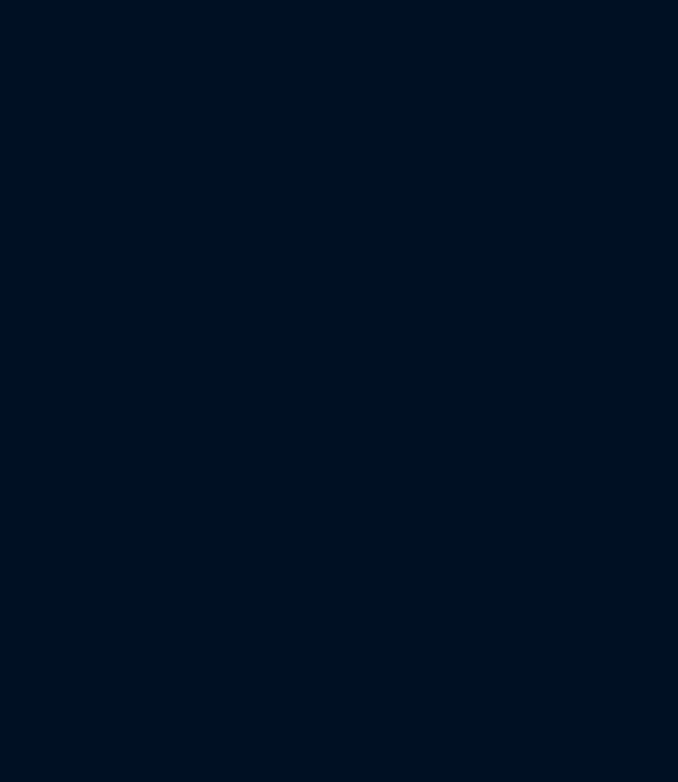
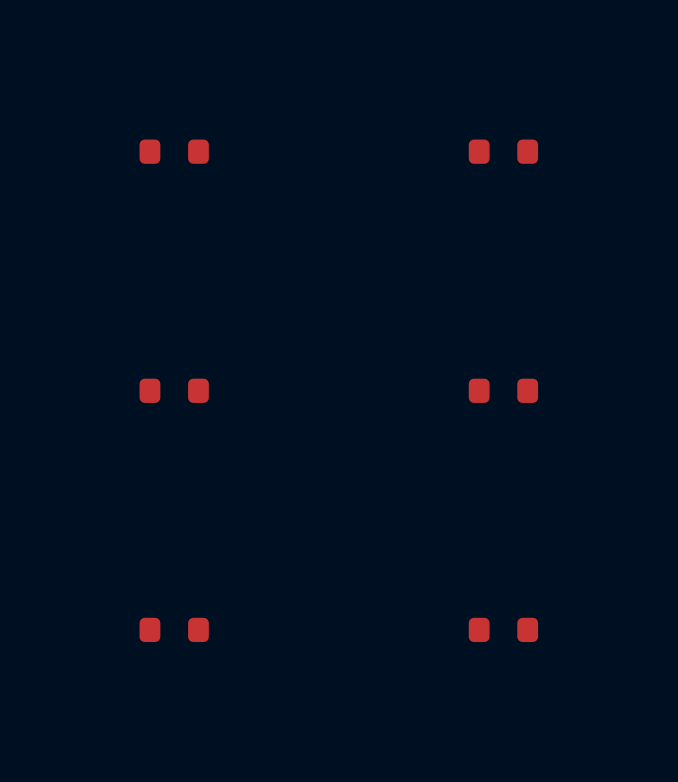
part: none -> (174, 151)
part: none -> (503, 151)
part: none -> (174, 390)
part: none -> (503, 390)
part: none -> (174, 629)
part: none -> (503, 629)

